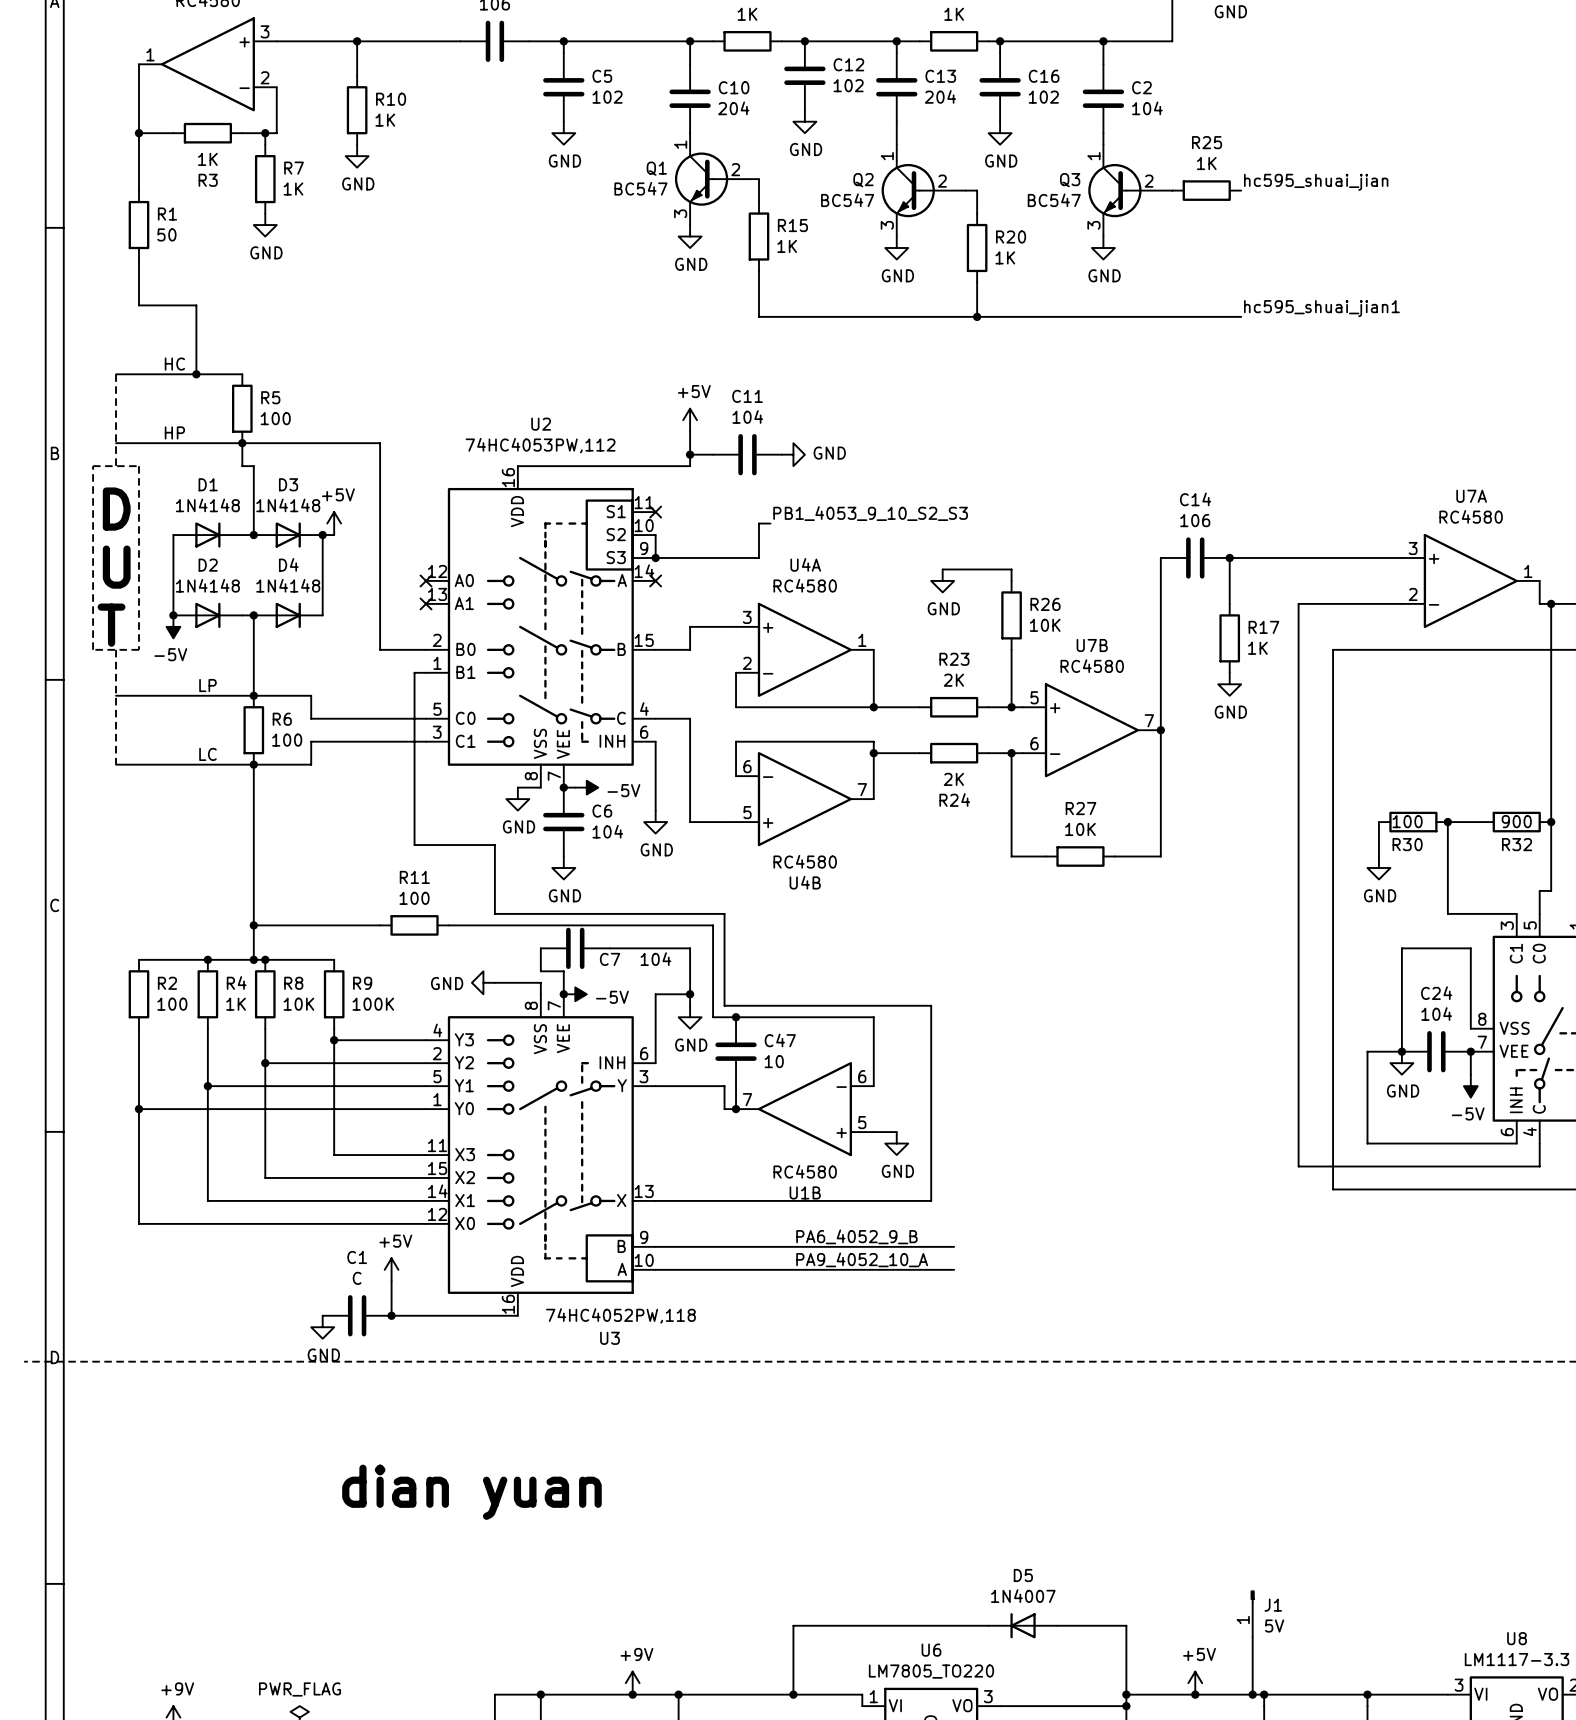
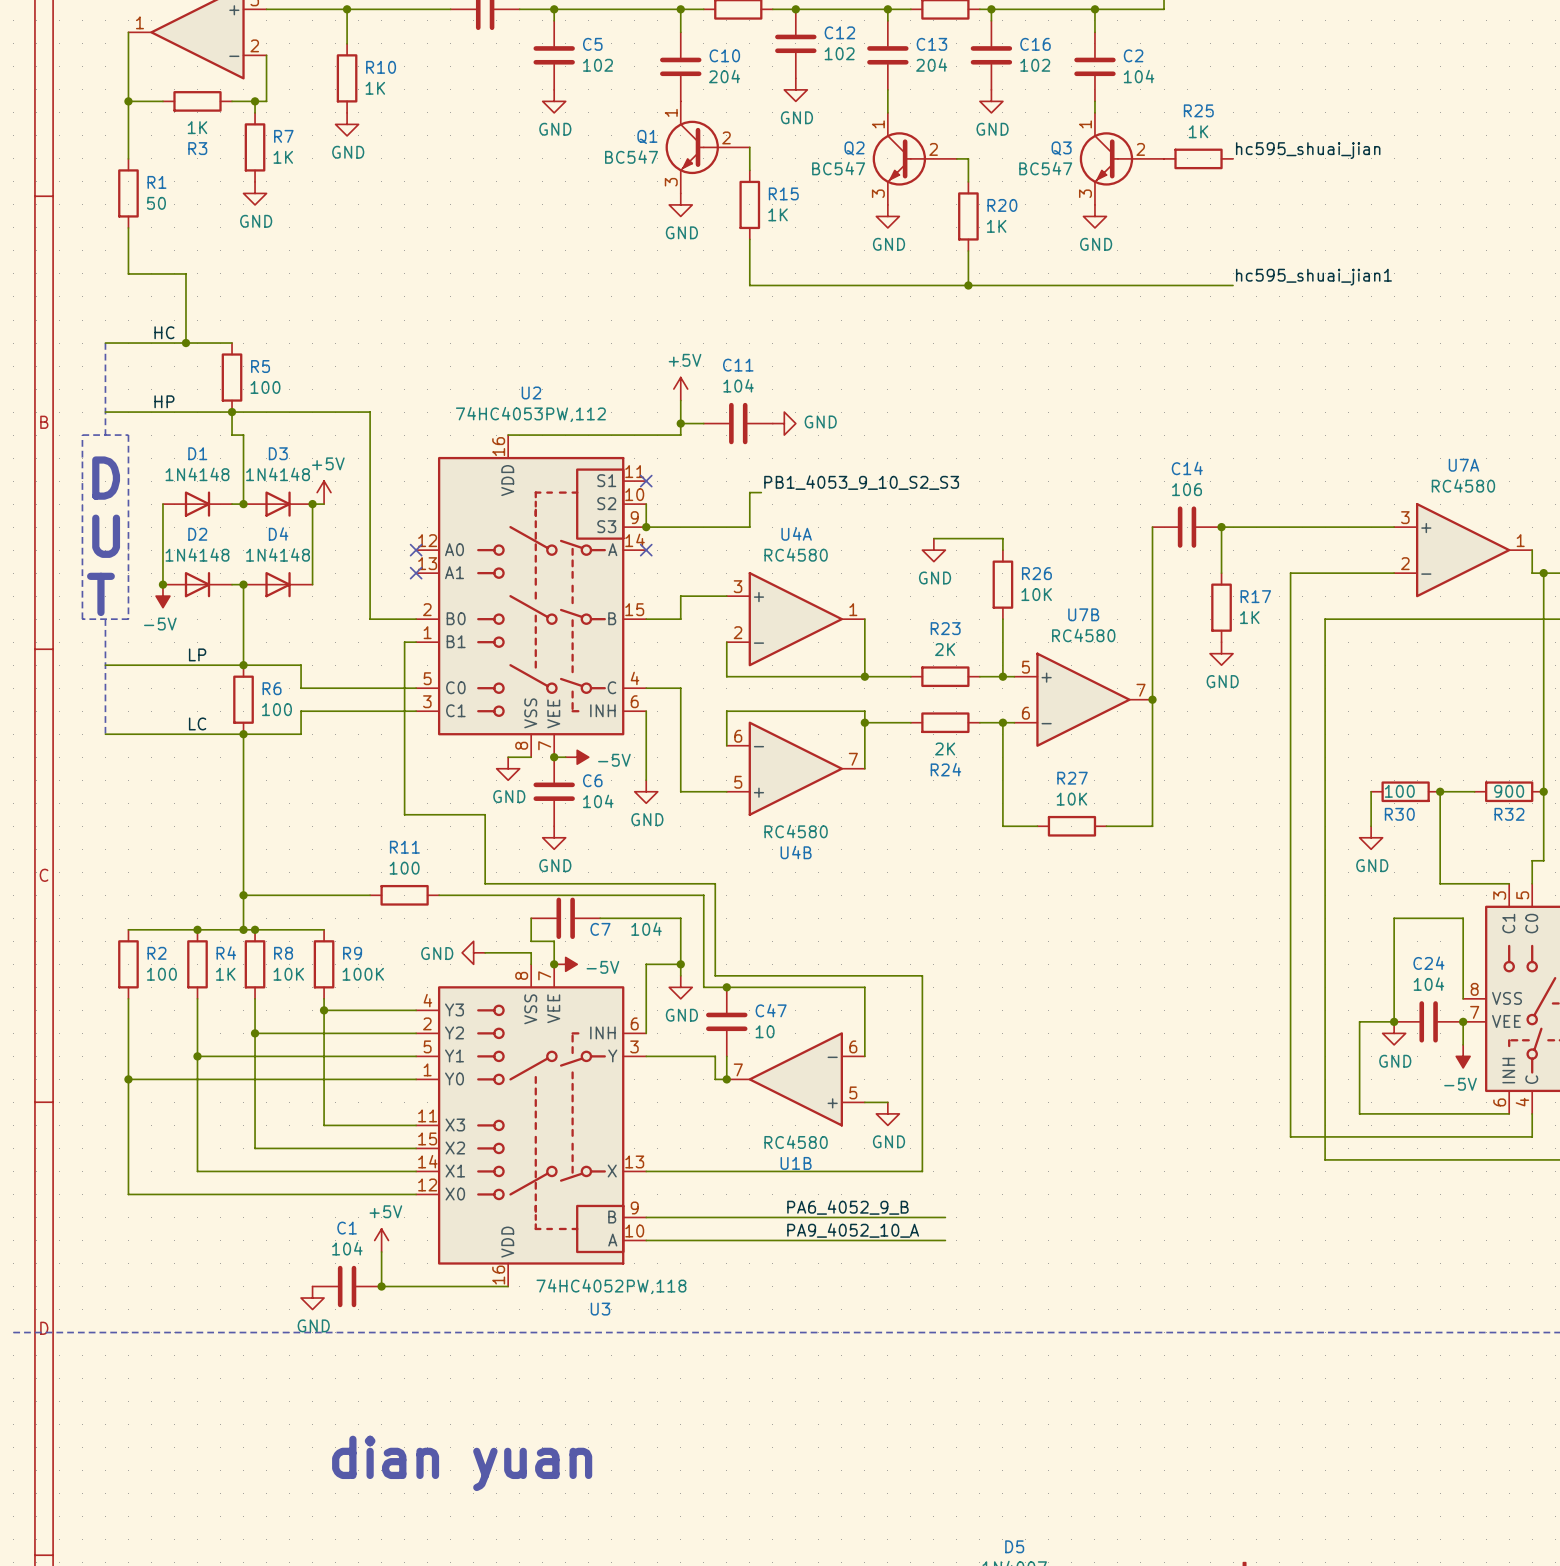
C1 value: C (357, 1278) -> 104 (347, 1248)

